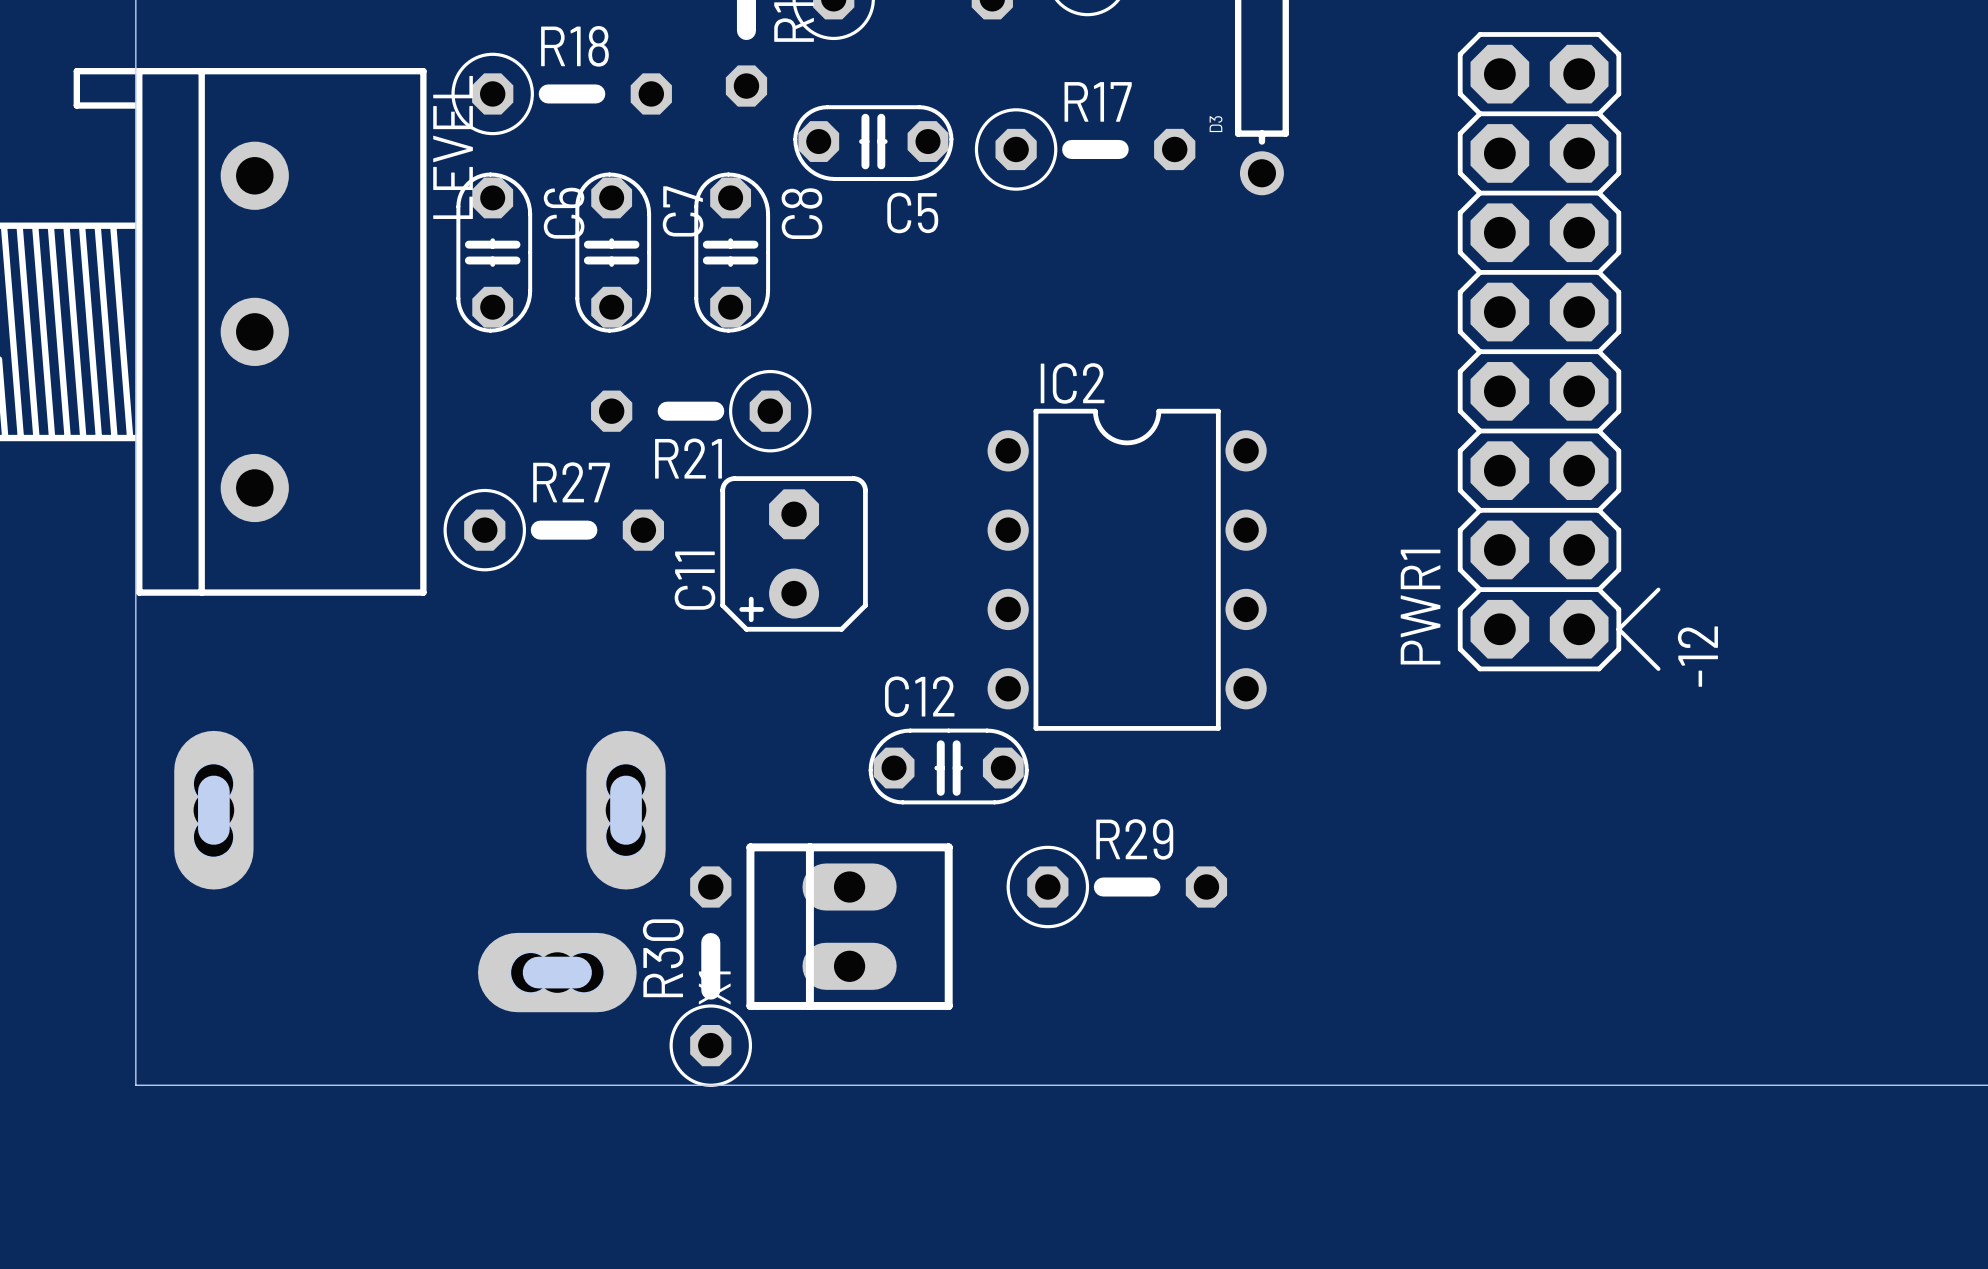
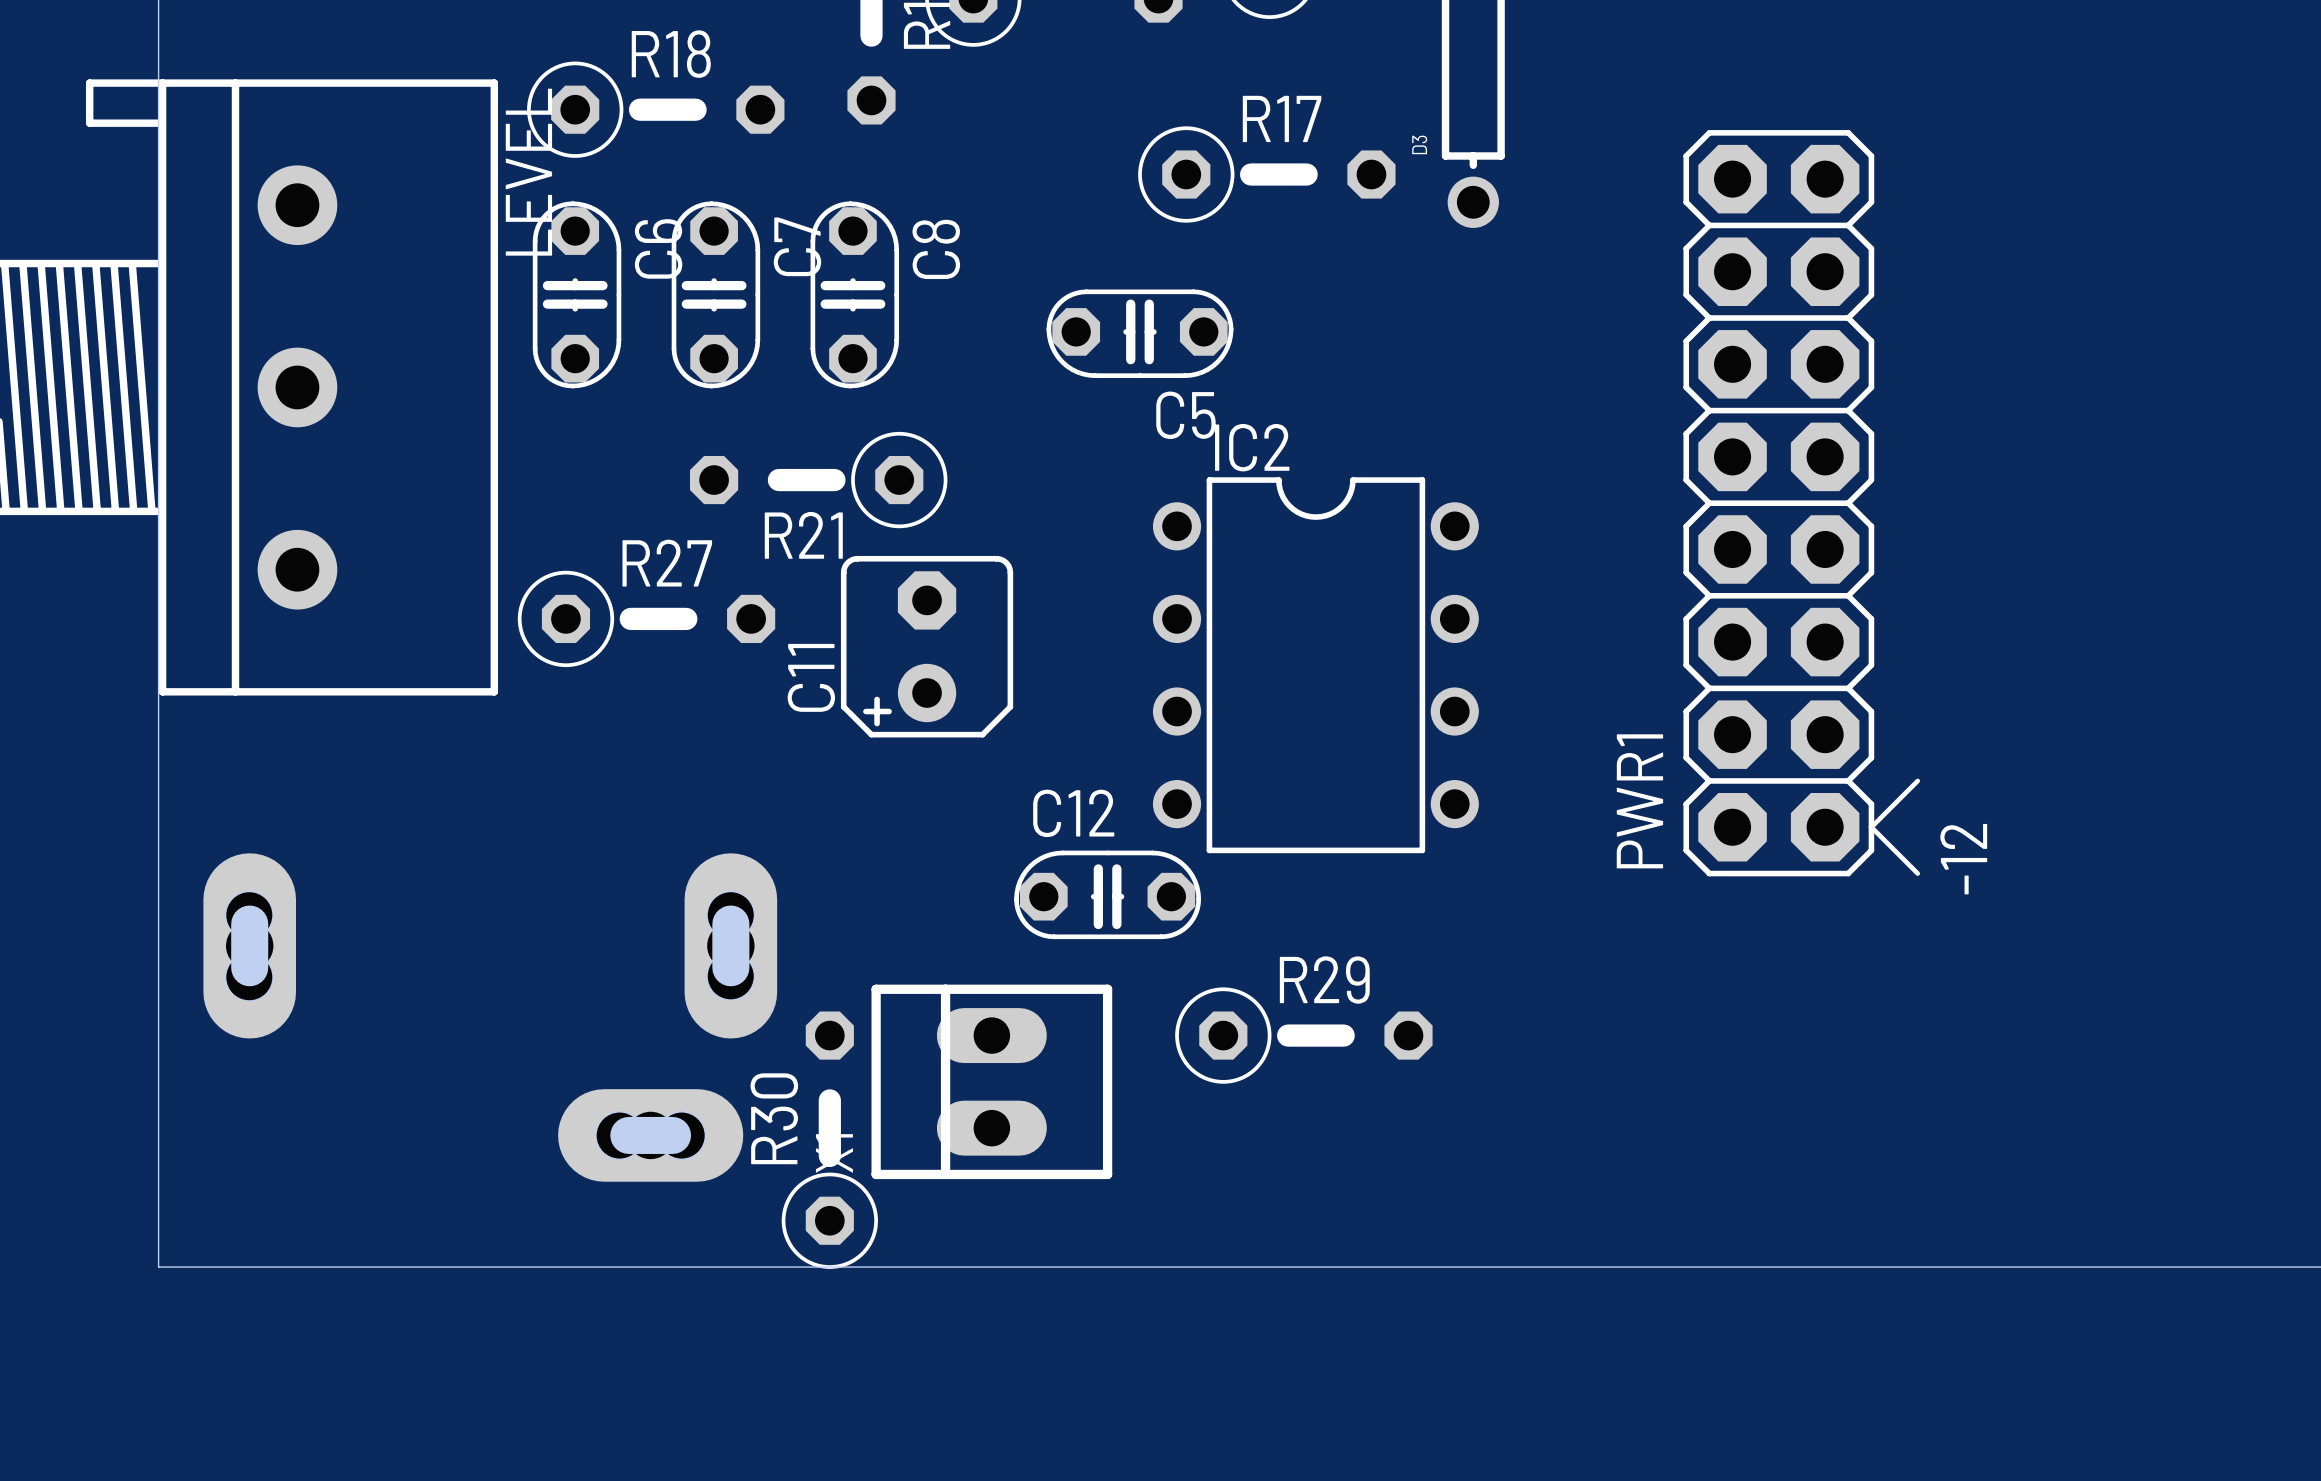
C5 position: (873, 143) -> (1140, 333)
PWR1 position: (1559, 351) -> (1801, 503)

